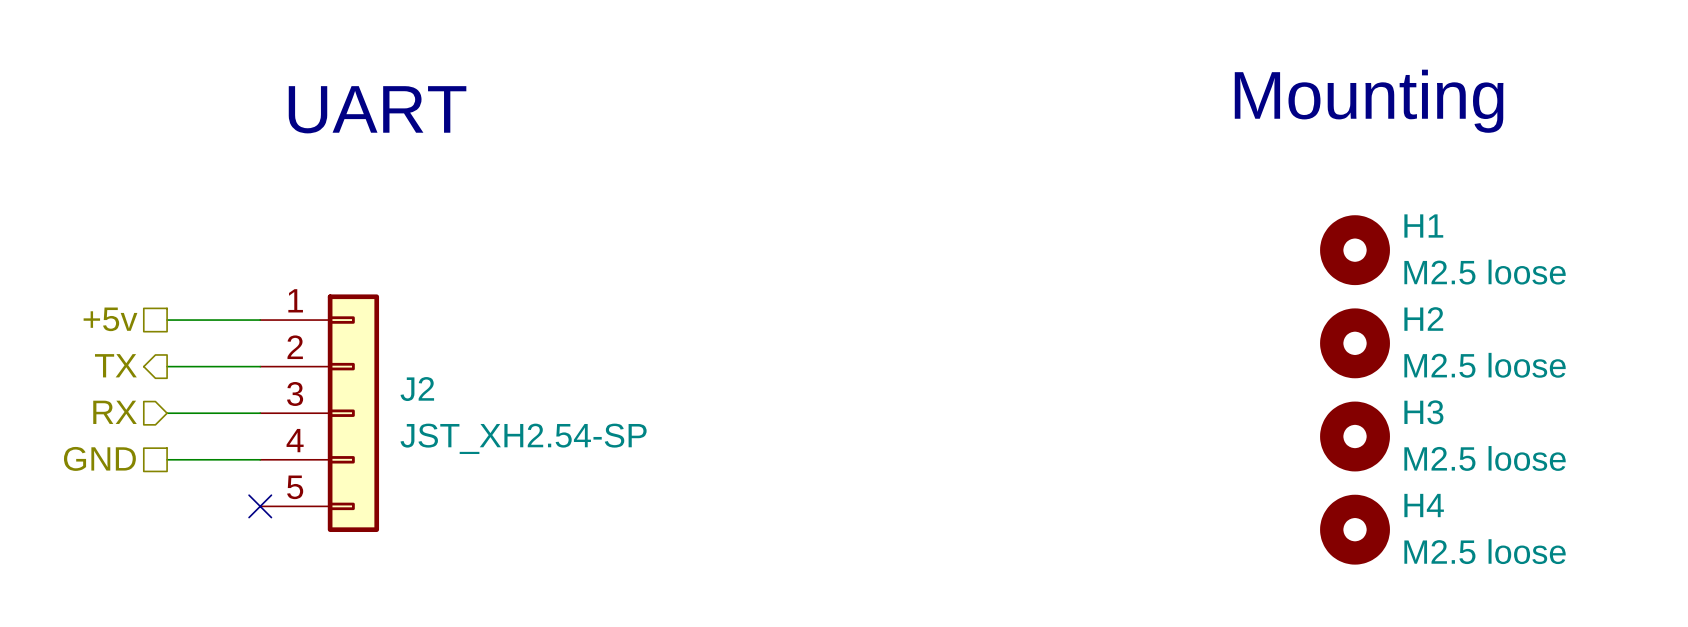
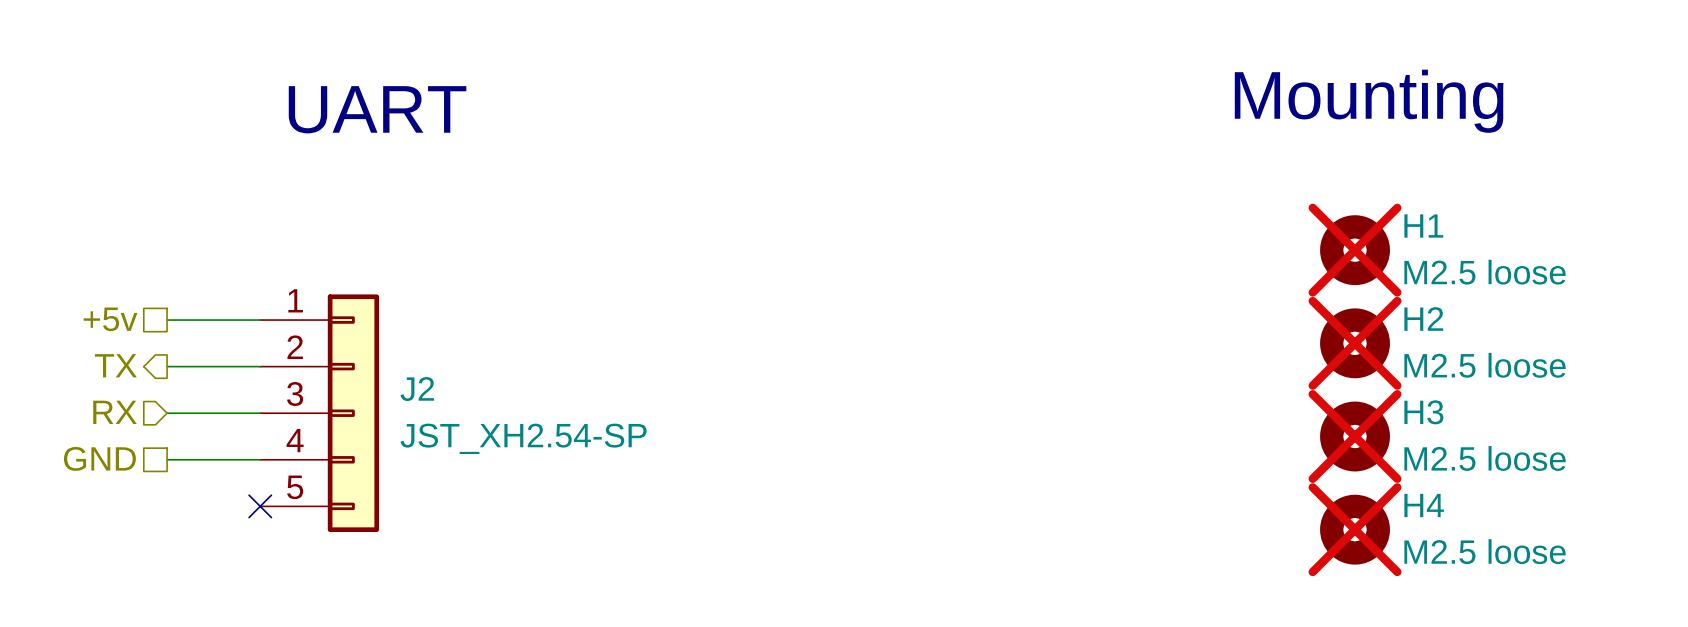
H1 do-not-place cross: none -> (1355, 250)
H2 do-not-place cross: none -> (1355, 343)
H3 do-not-place cross: none -> (1355, 436)
H4 do-not-place cross: none -> (1355, 529)

